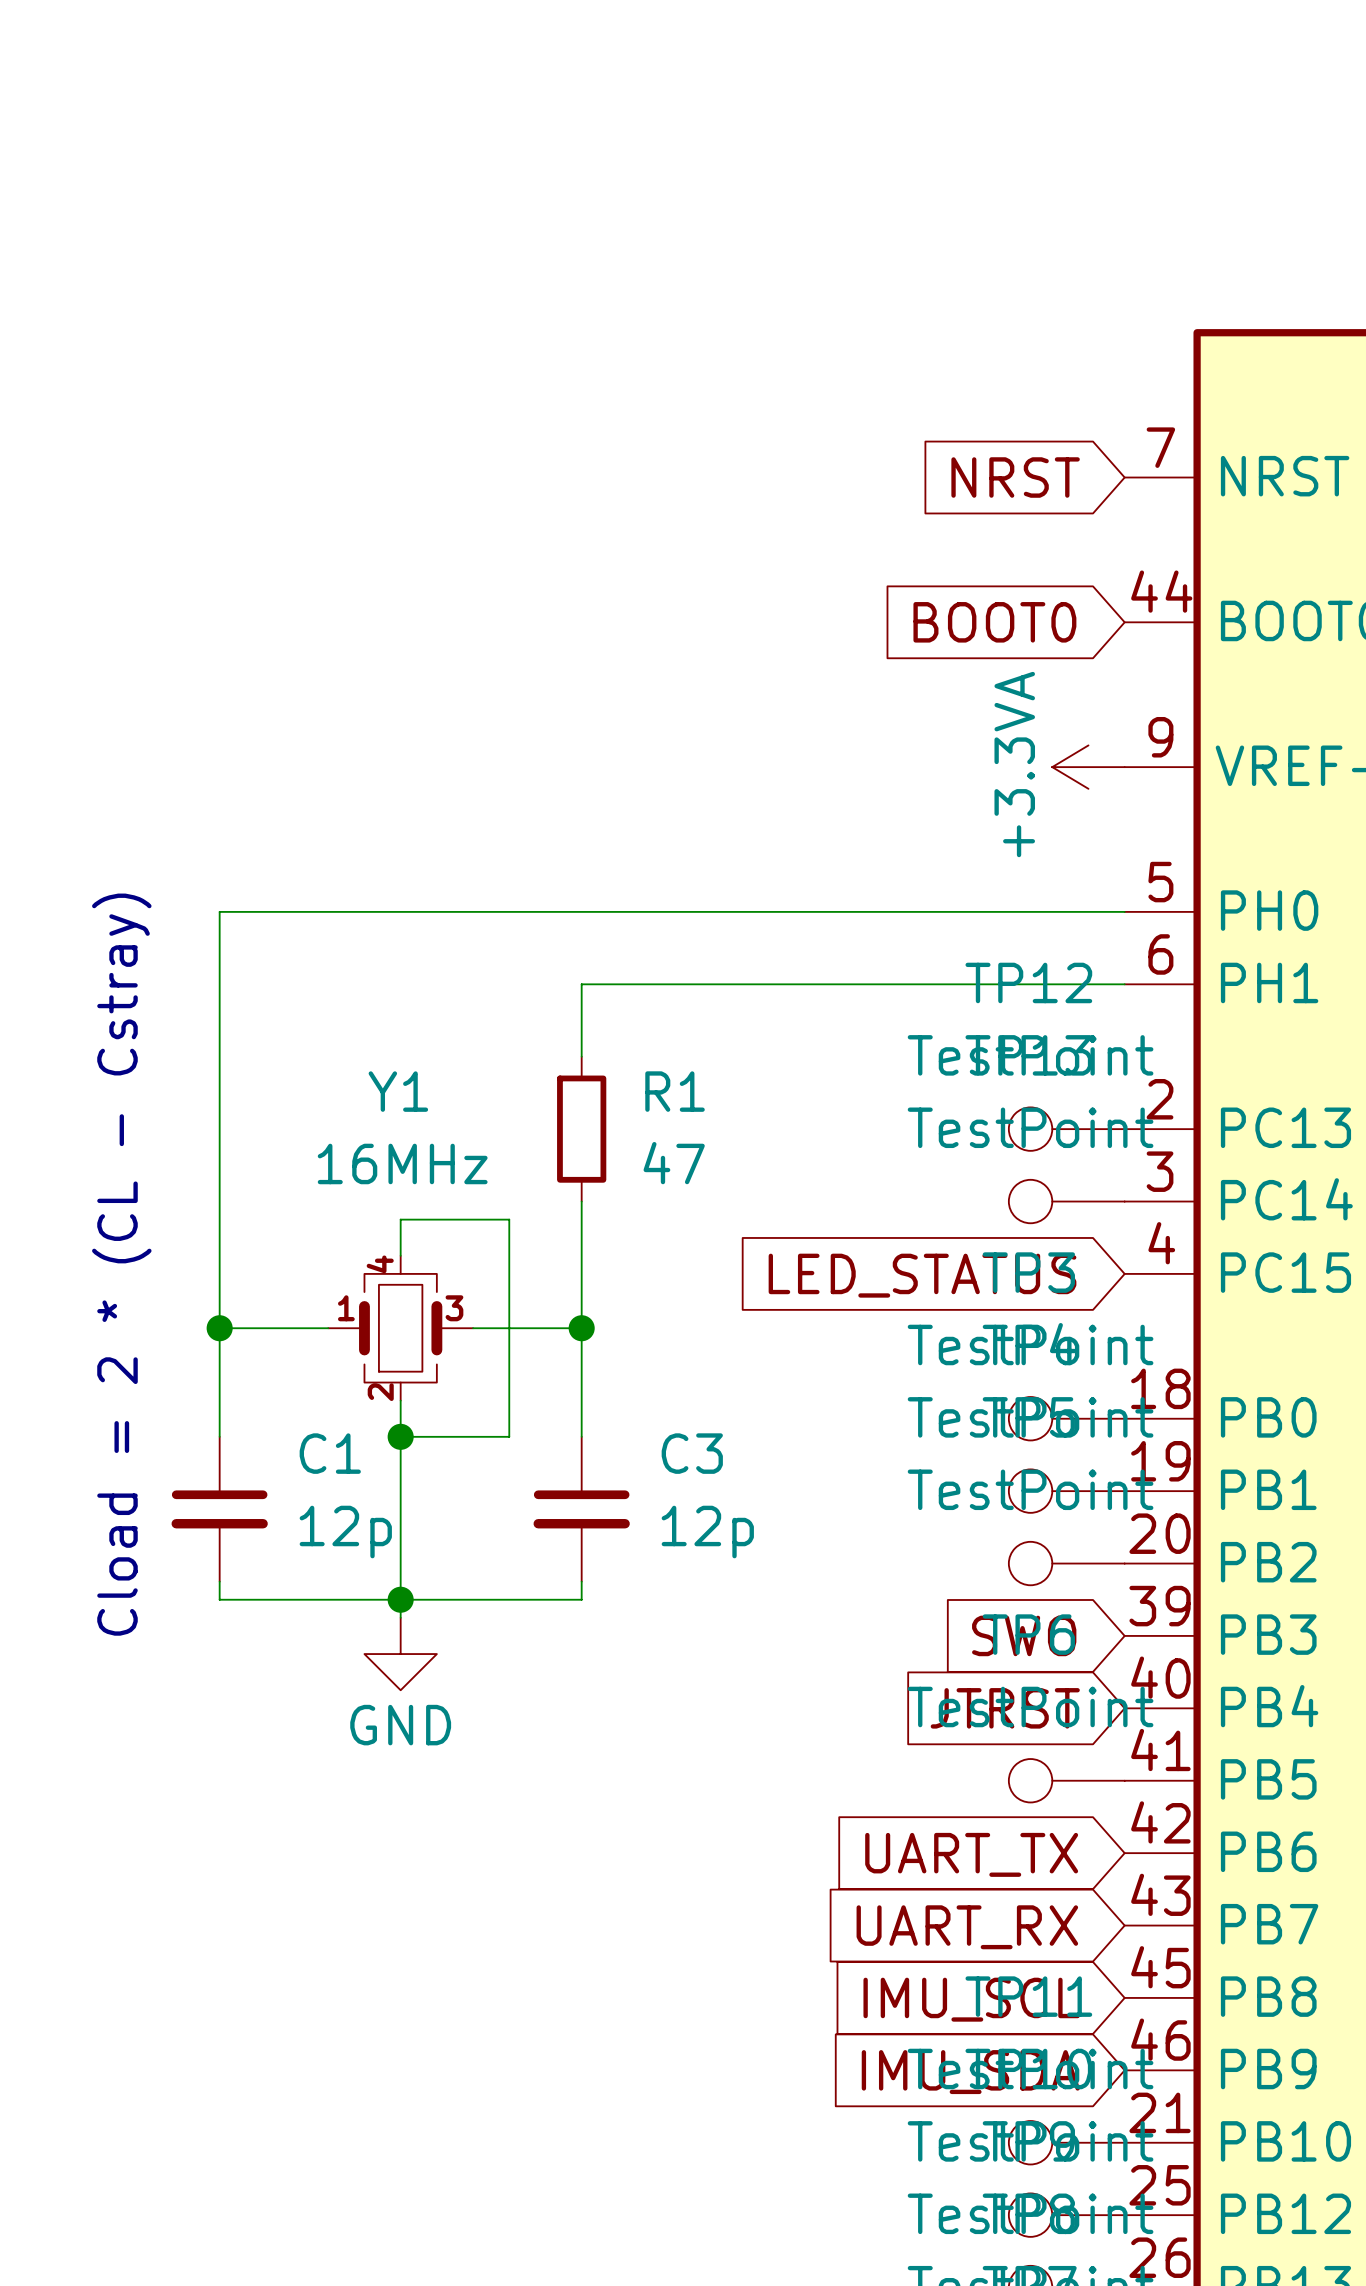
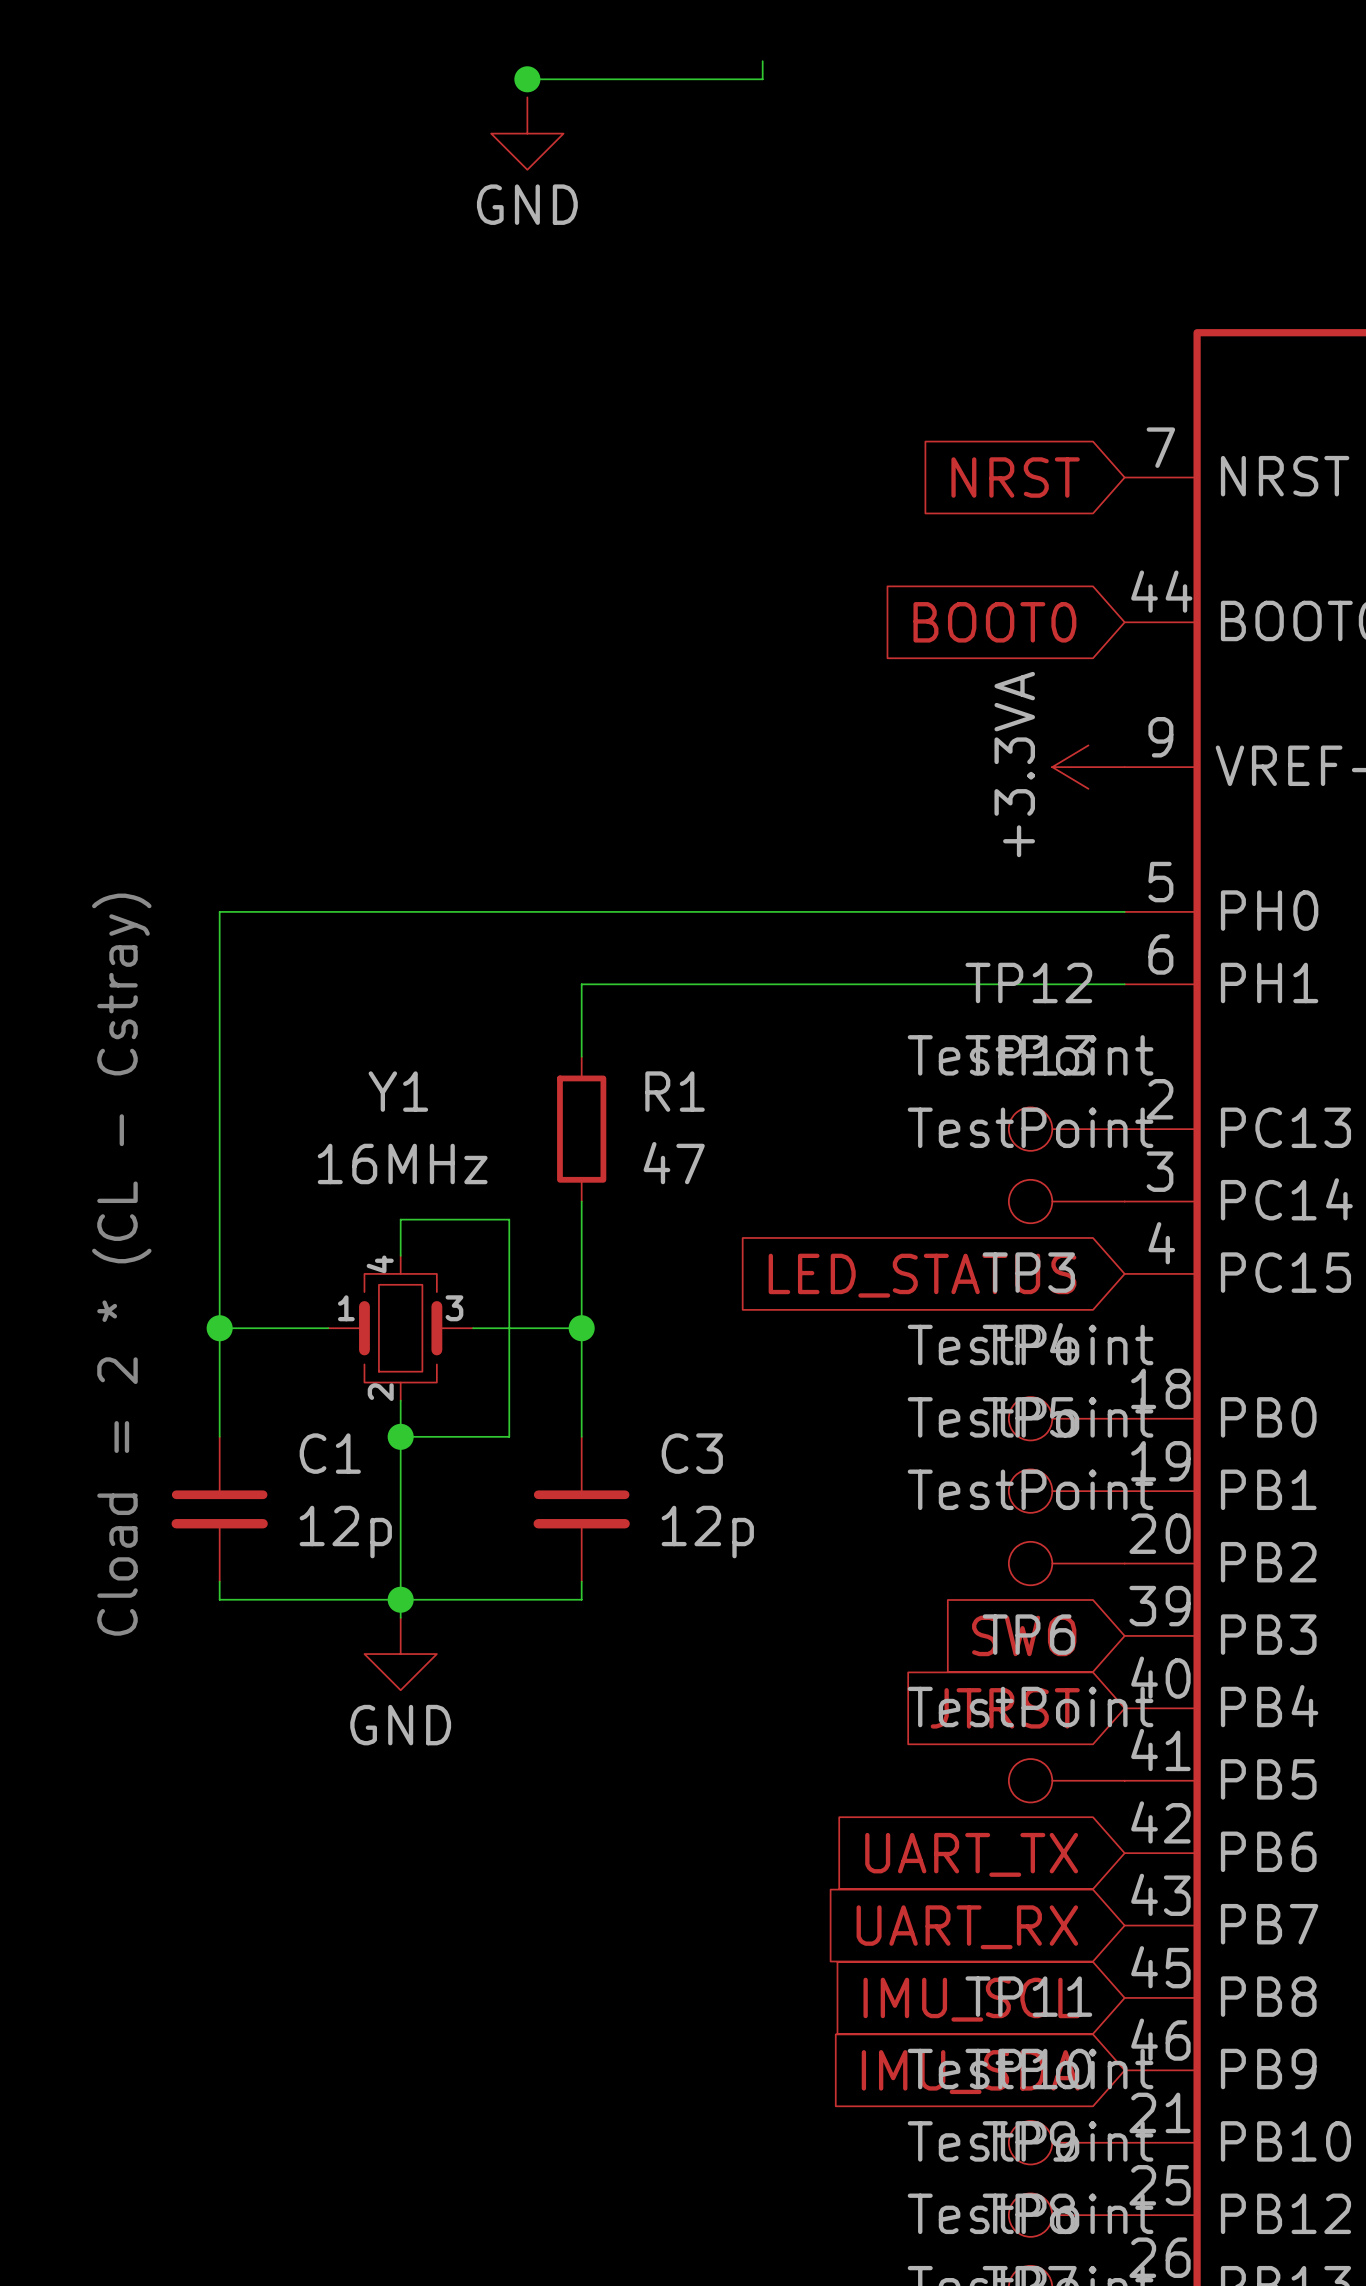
wire: none -> (762, 61) (762, 79) (527, 79)
junction: none -> (527, 79)
power symbol: none -> GND (527, 133)

